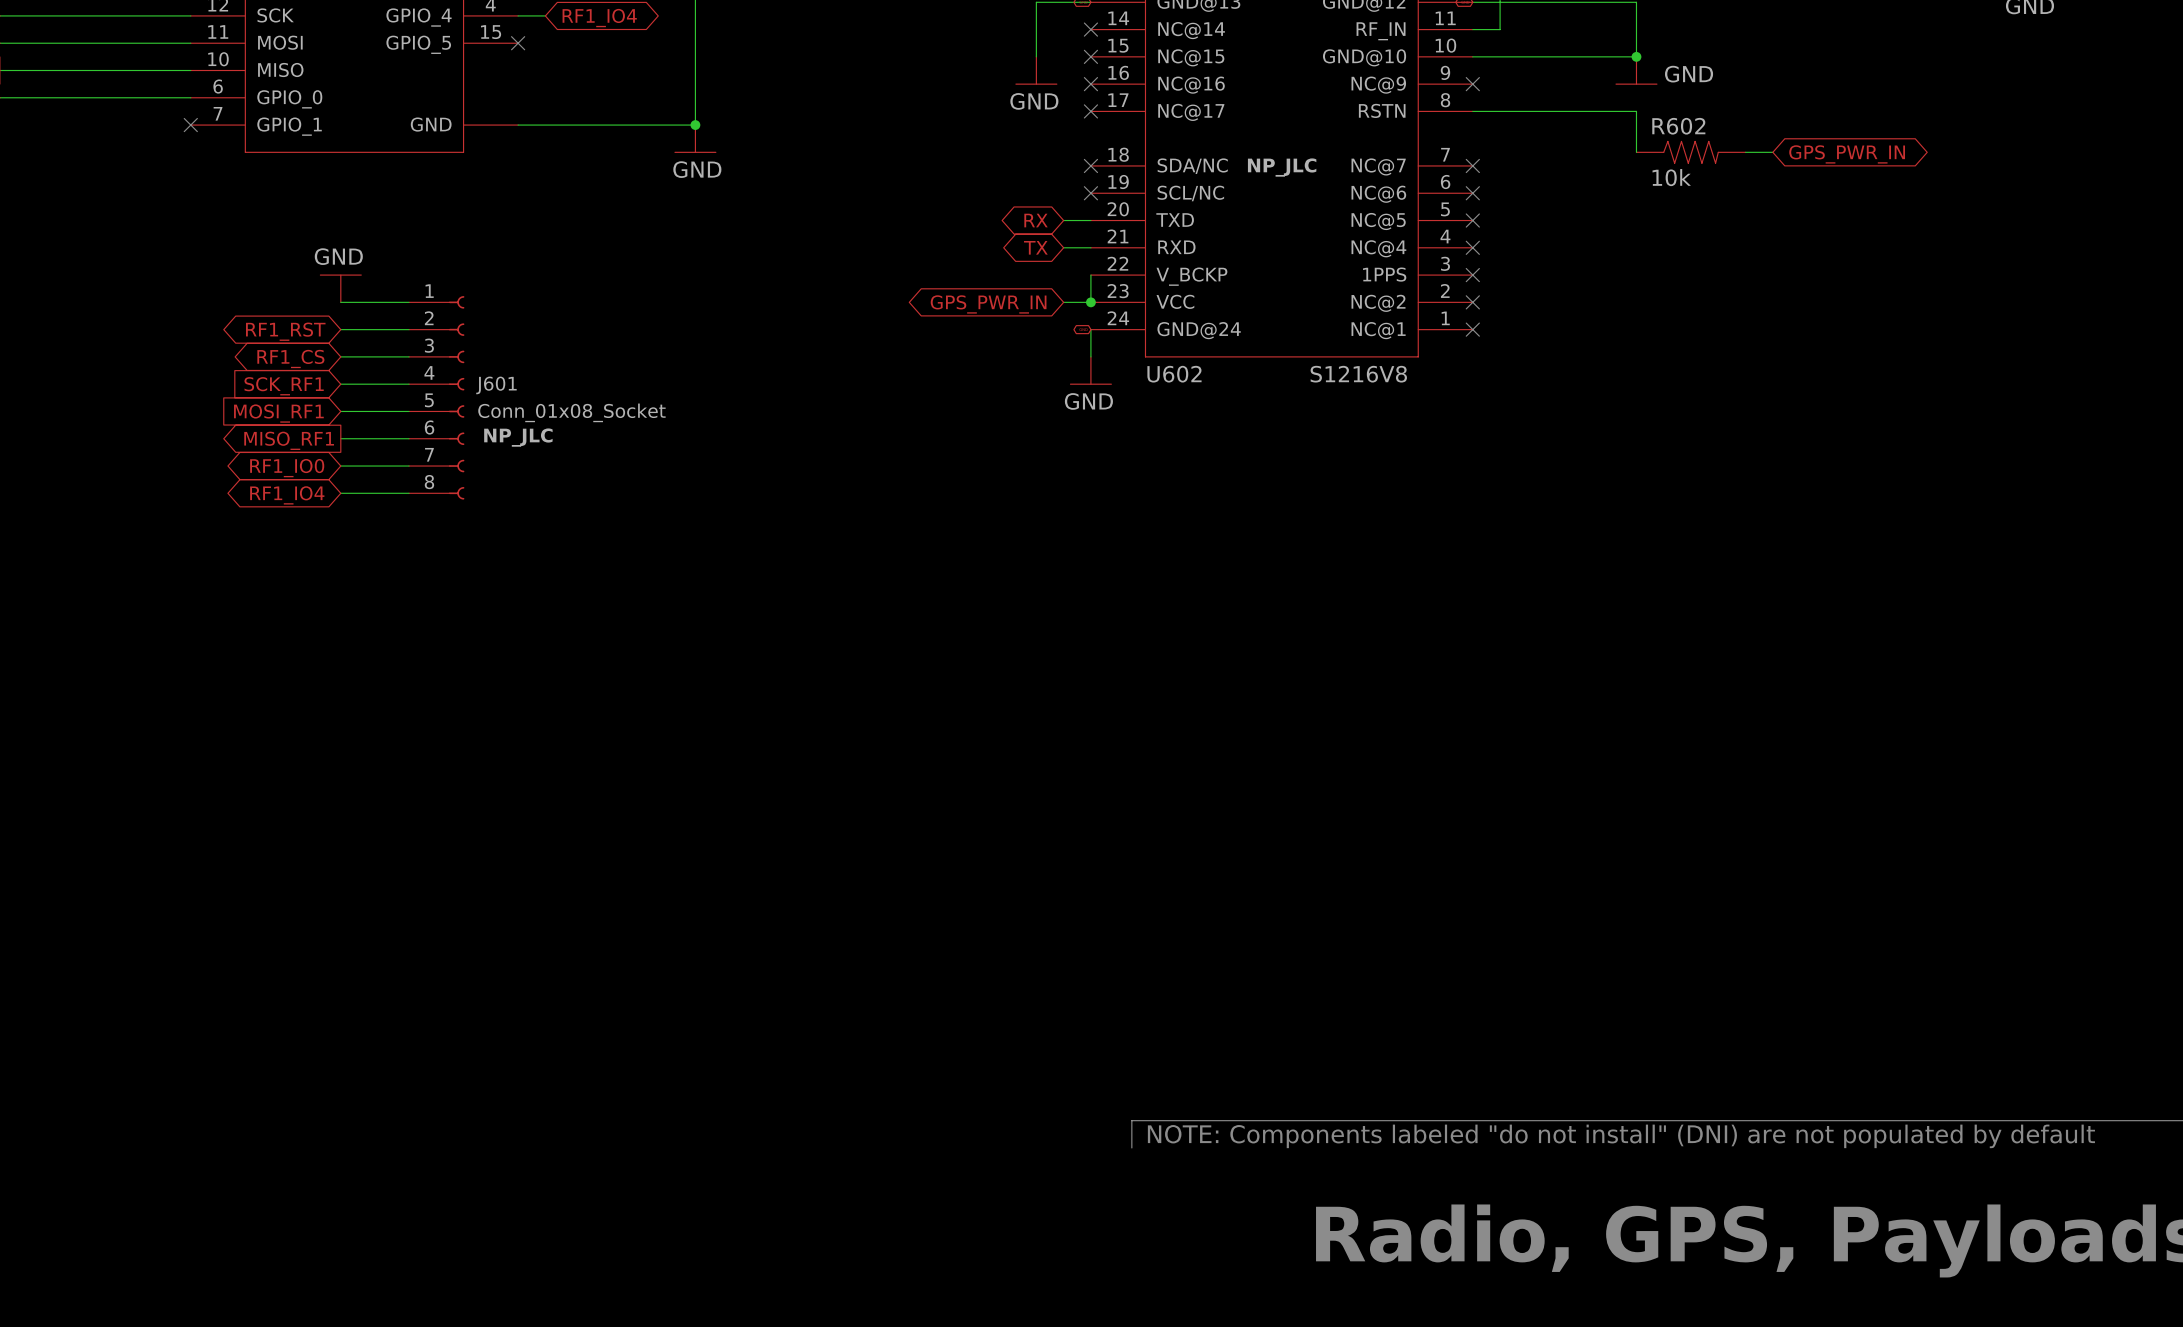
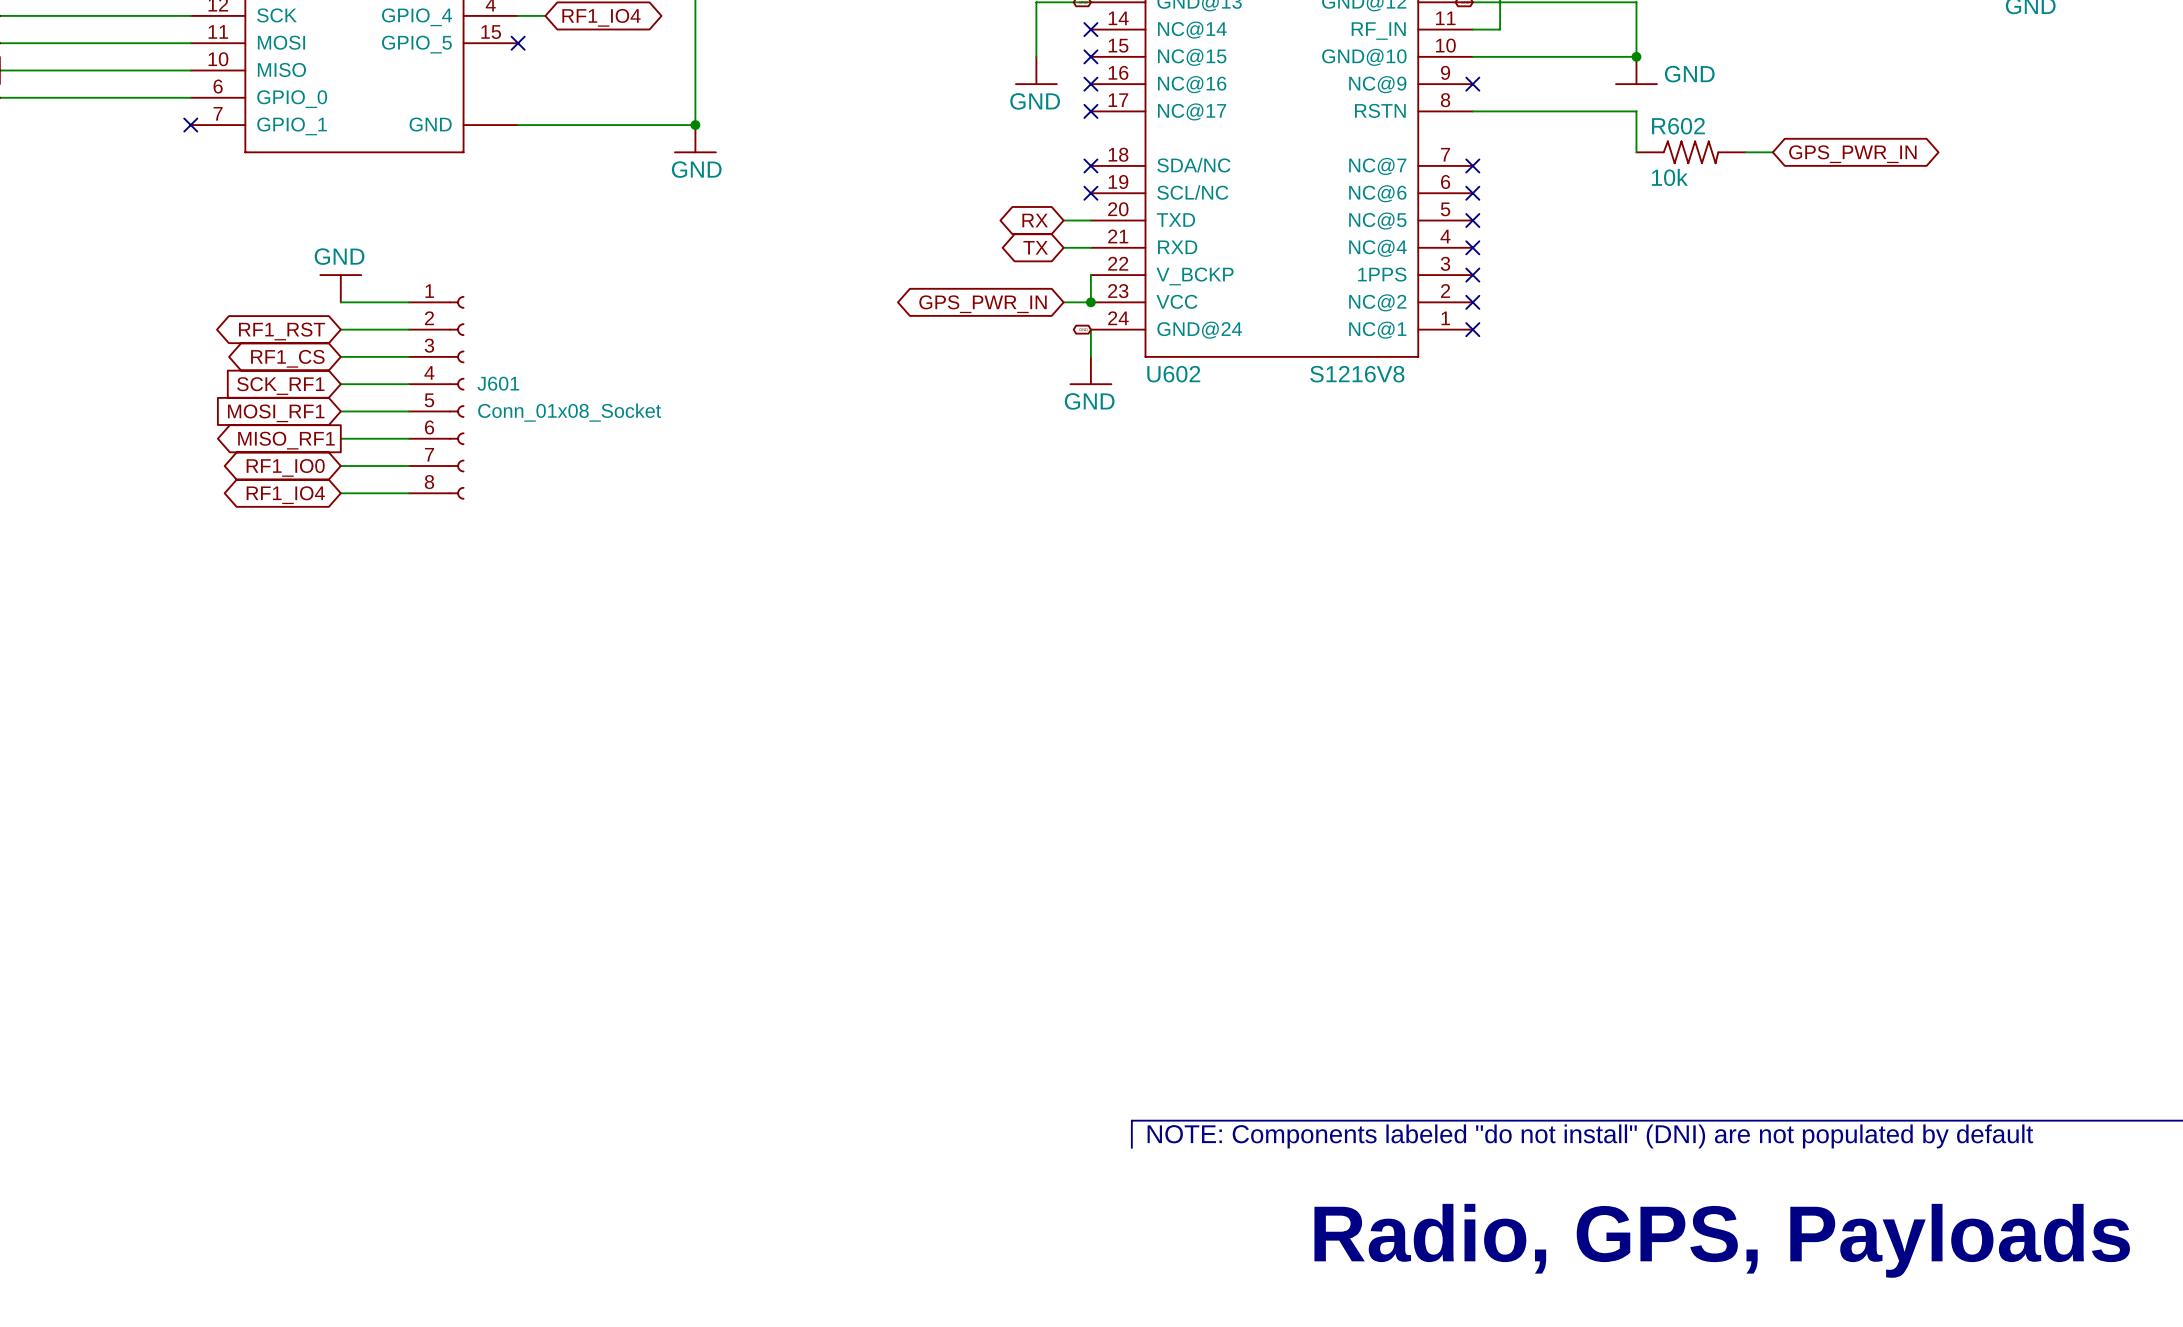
U602 text: NP_JLC (1282, 167) -> none
J601 text: NP_JLC (518, 437) -> none

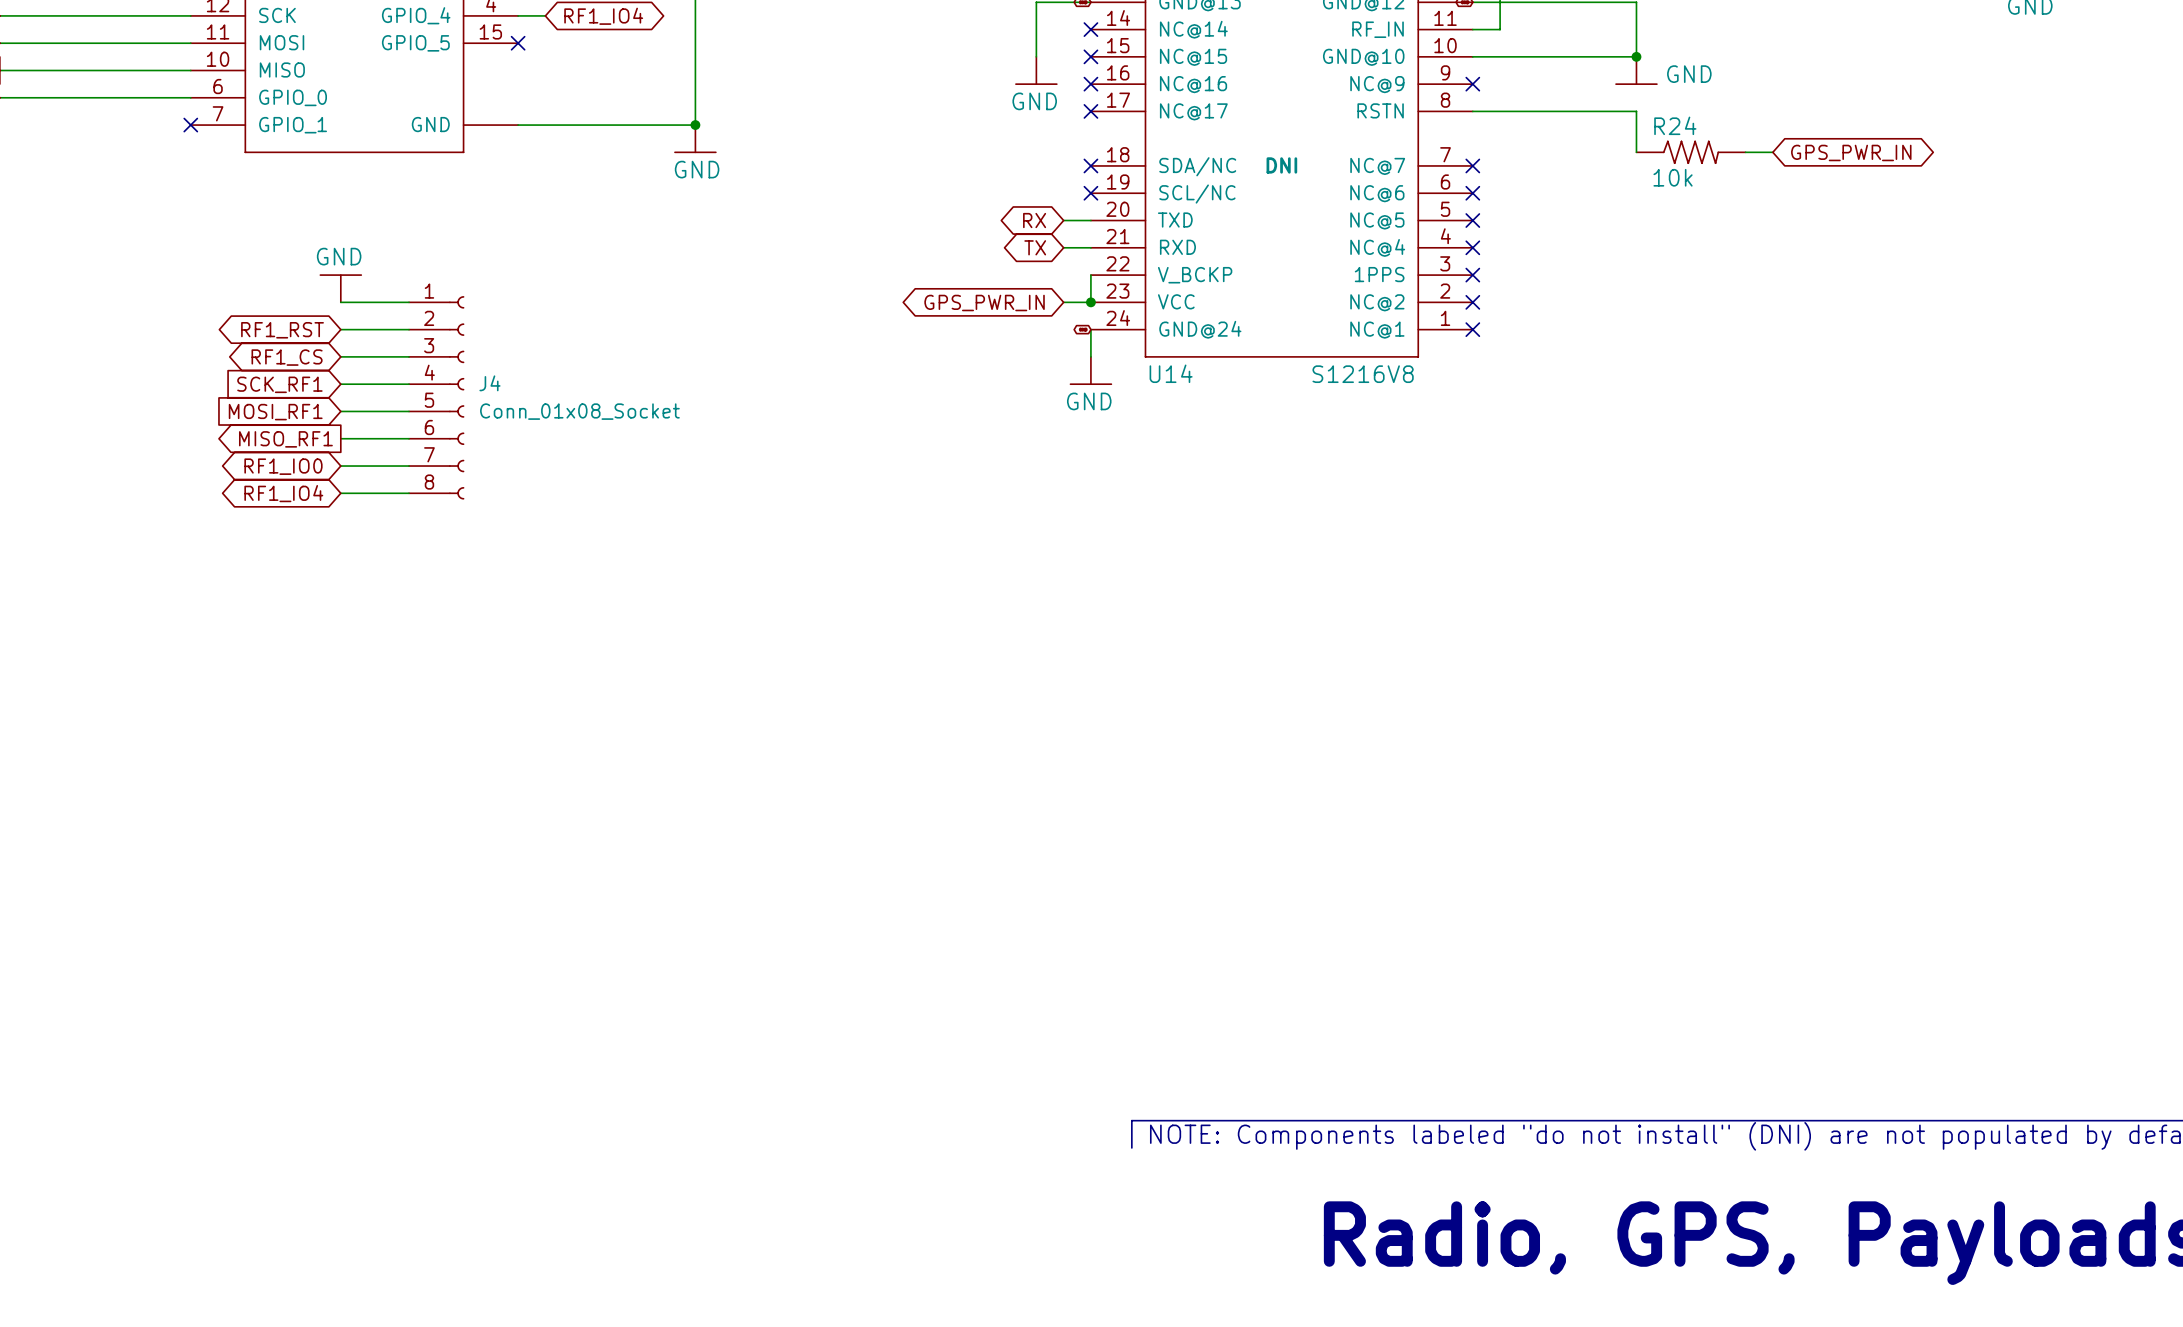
R602 name: R602 (1678, 126) -> R24 (1675, 125)
U602 text: none -> DNI (1281, 165)
U602 name: U602 (1173, 374) -> U14 (1171, 373)
J601 name: J601 (498, 383) -> J4 (489, 383)

